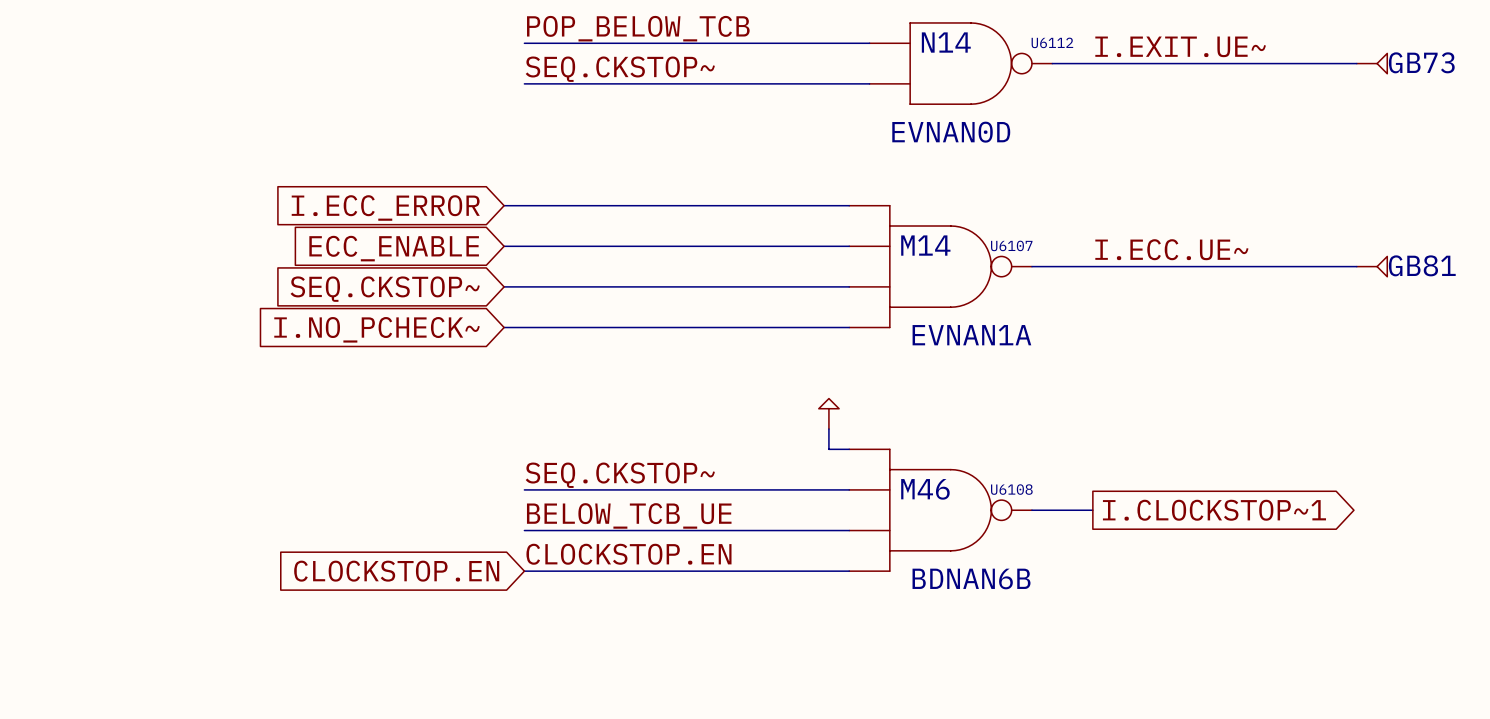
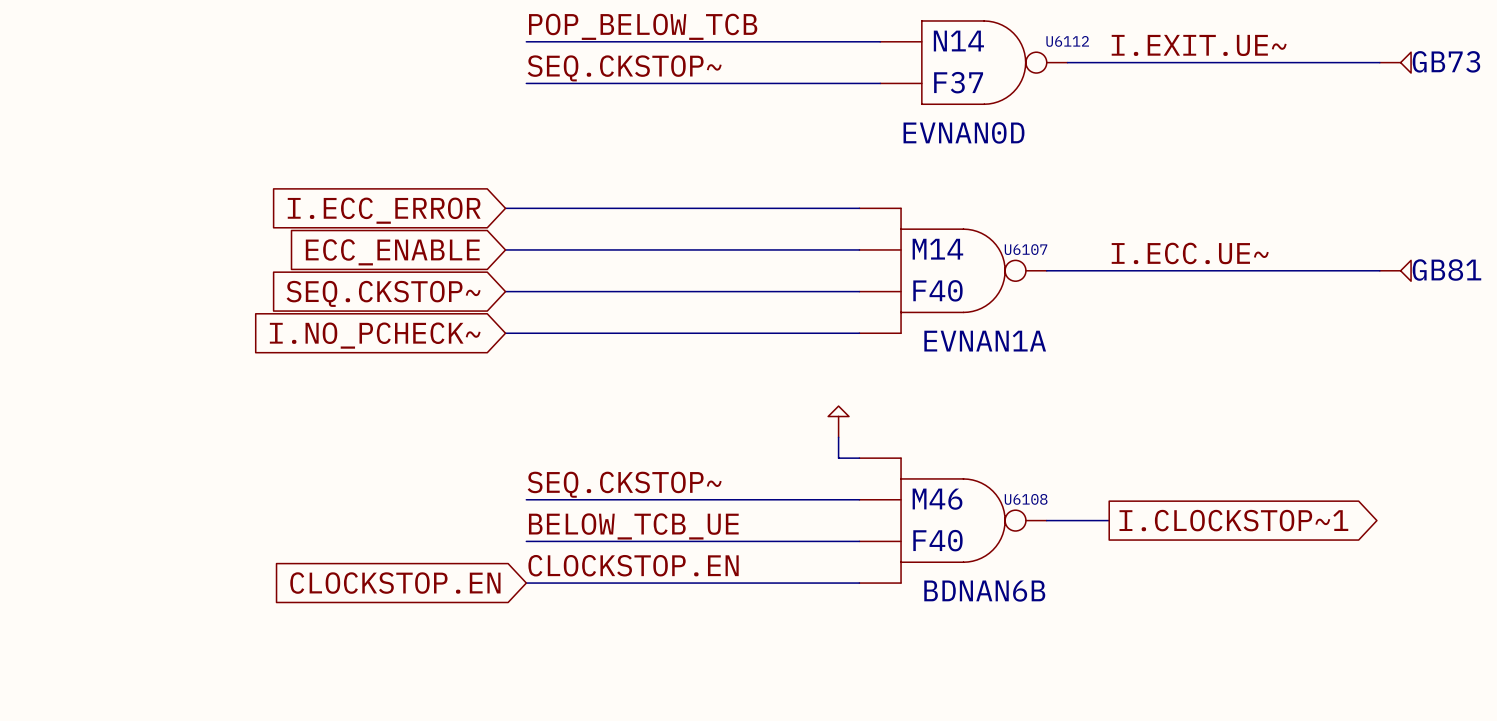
U6112 value: none -> F37 (958, 82)
U6107 value: none -> F40 (937, 290)
U6108 value: none -> F40 (937, 540)

